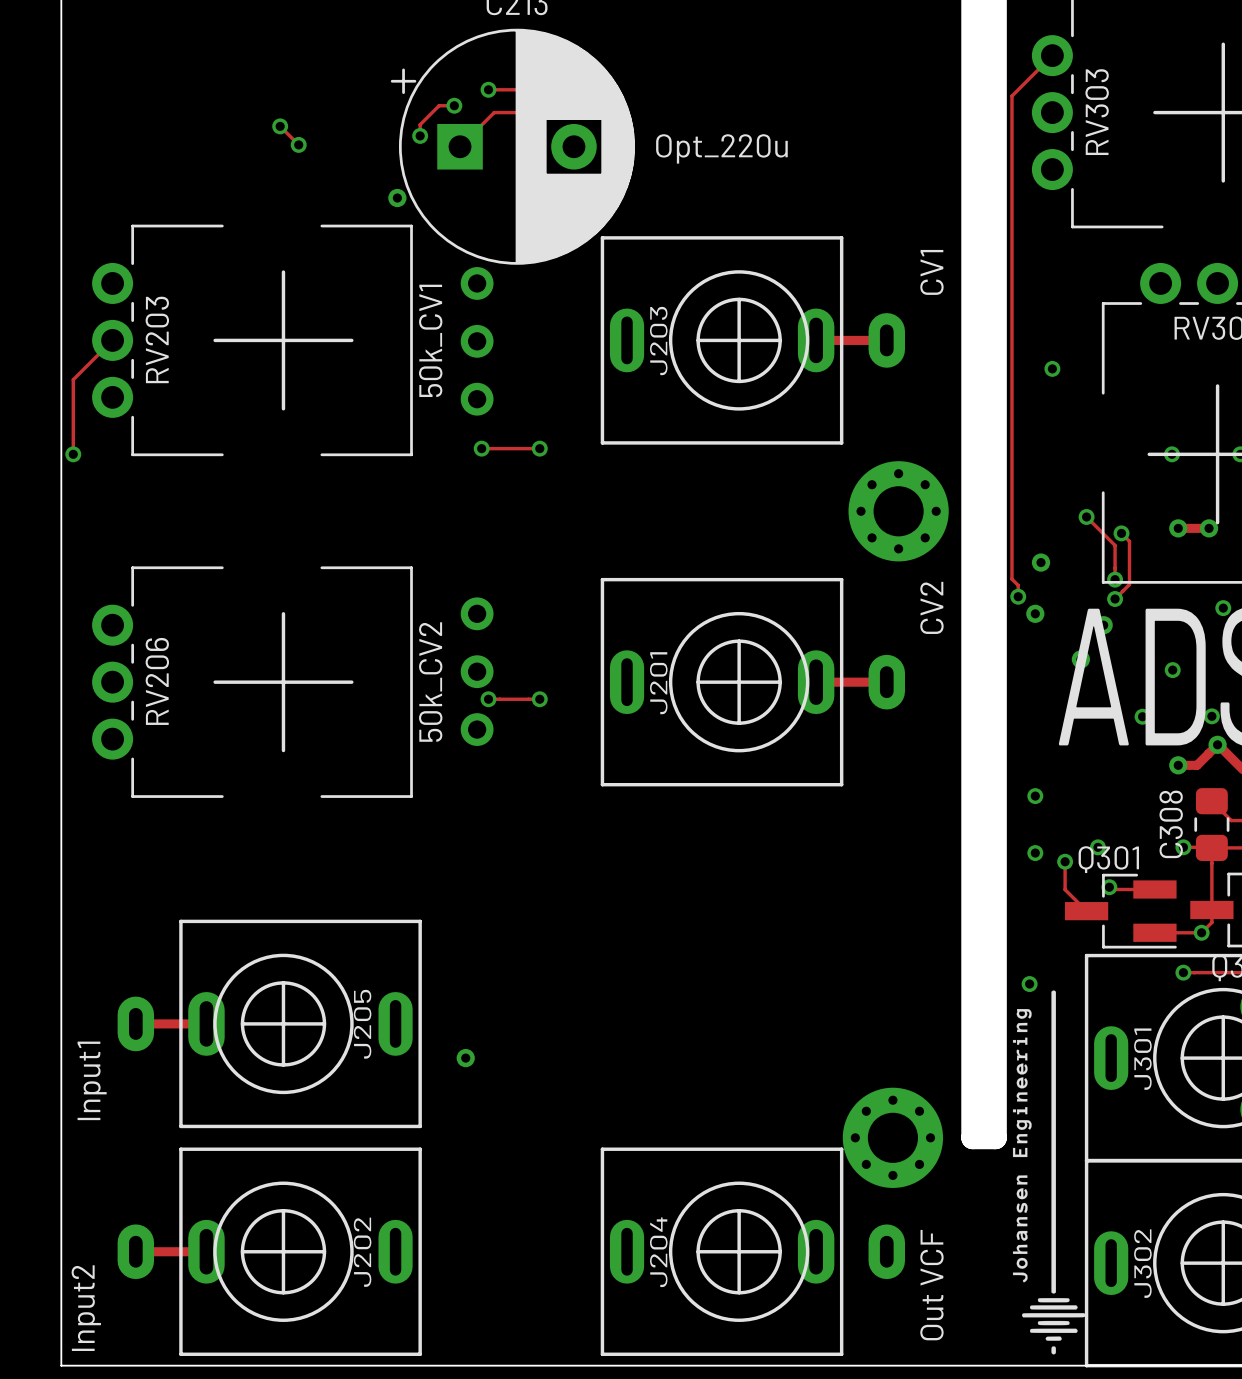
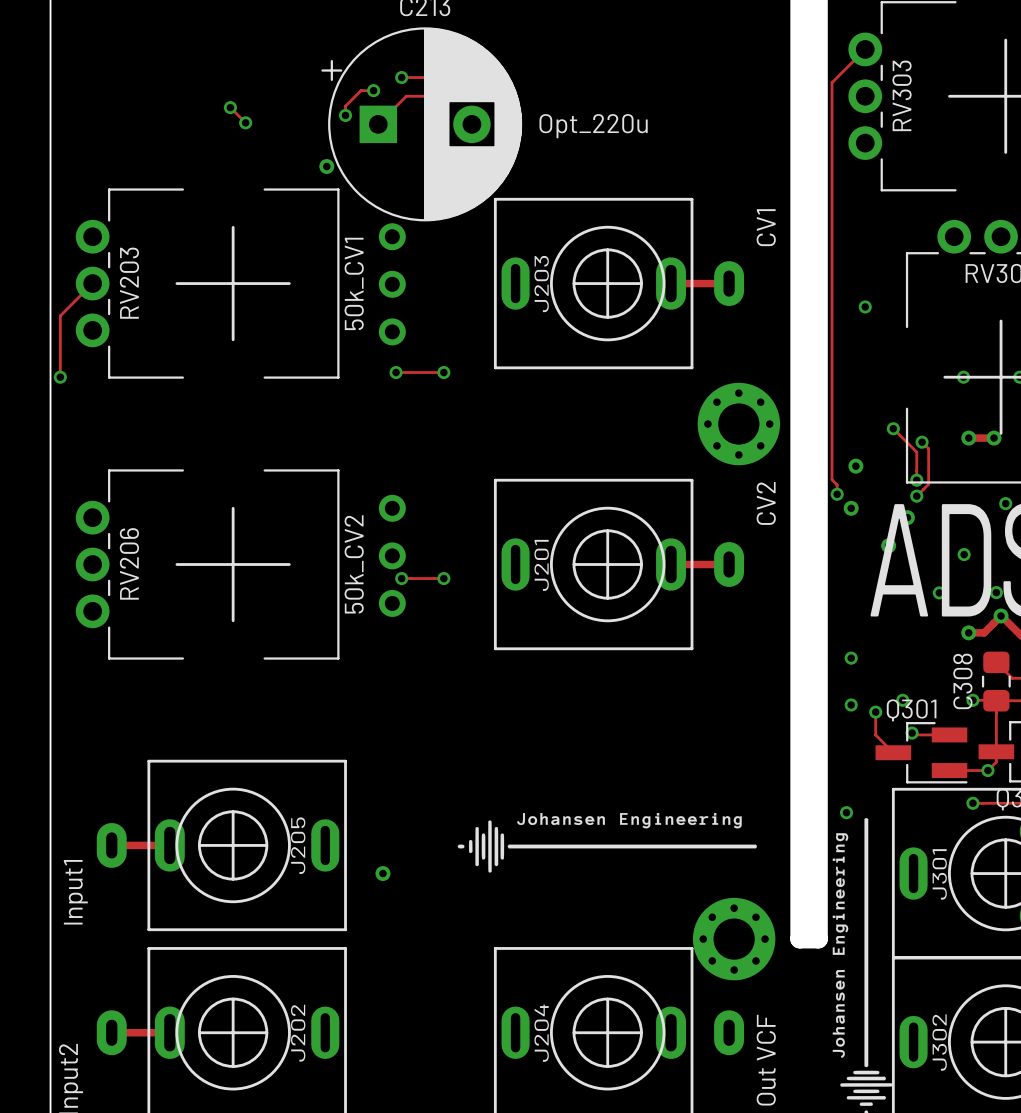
drawing: none -> [457, 813, 757, 873]

